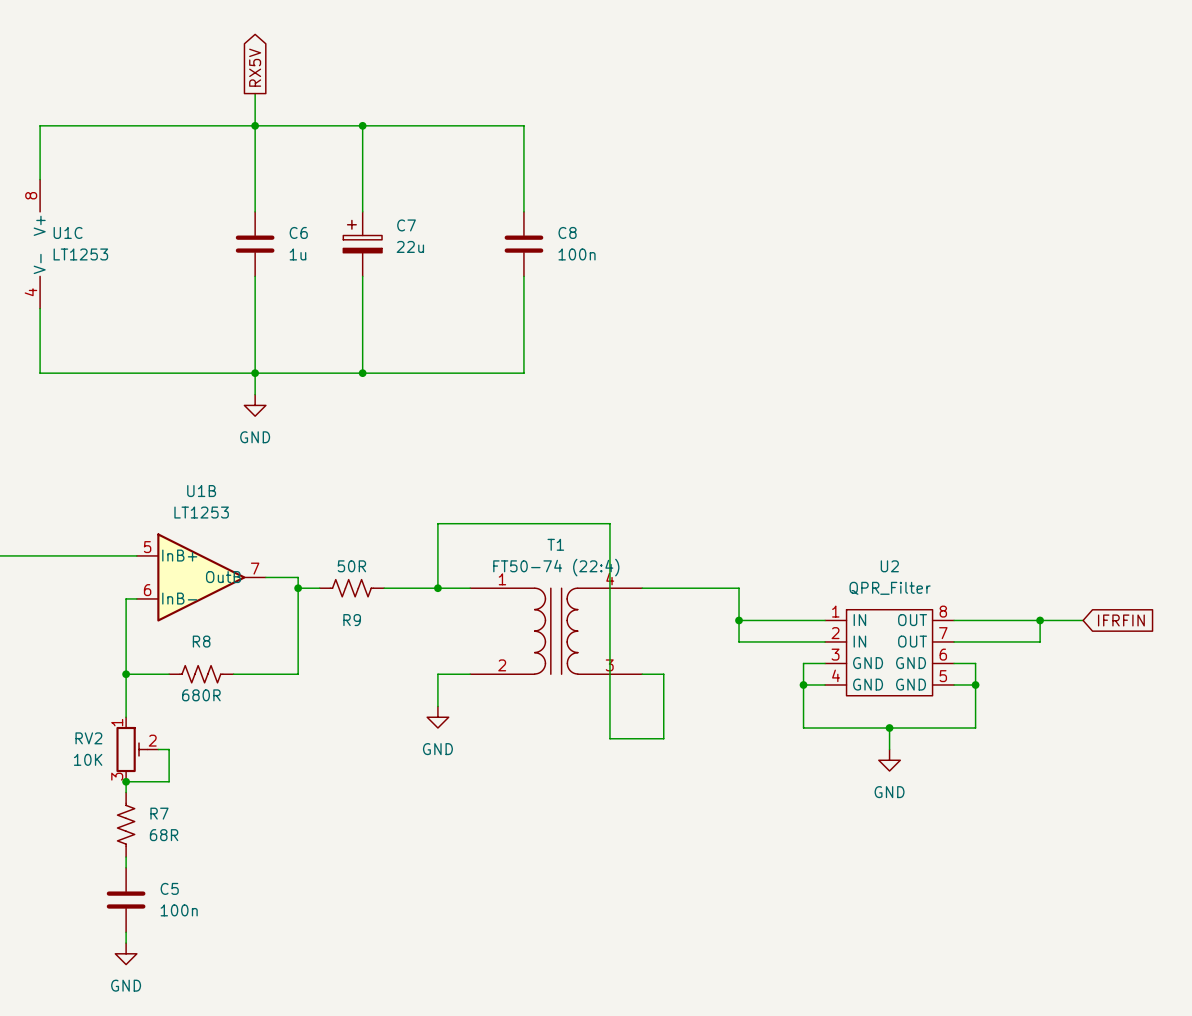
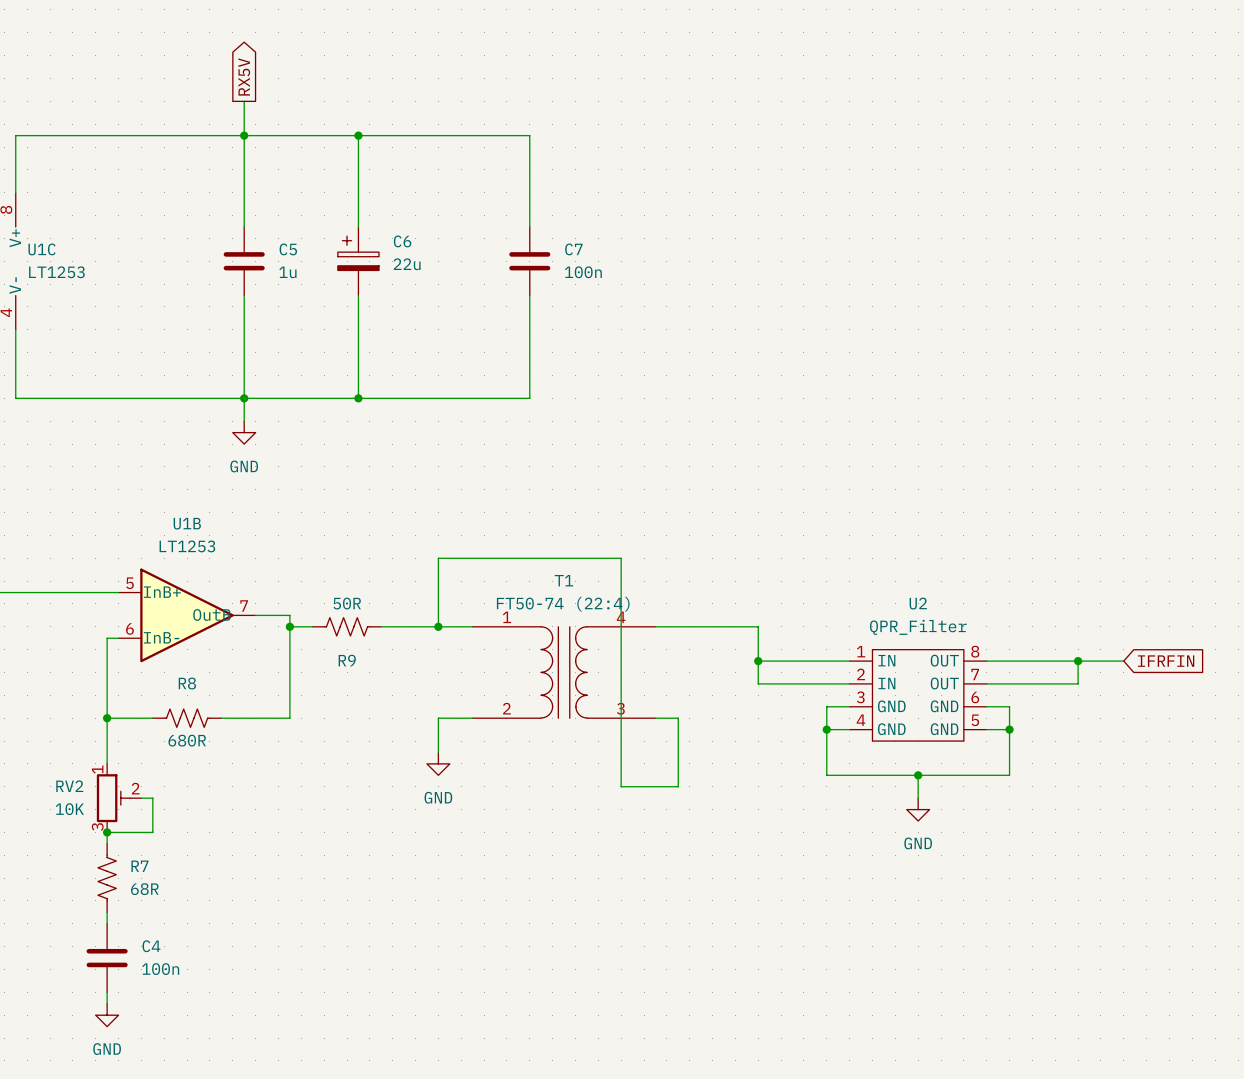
C7 name: C7 (406, 225) -> C6 (402, 241)
C6 name: C6 (298, 232) -> C5 (288, 249)
C8 name: C8 (567, 232) -> C7 (573, 249)
C5 name: C5 (169, 888) -> C4 (151, 946)

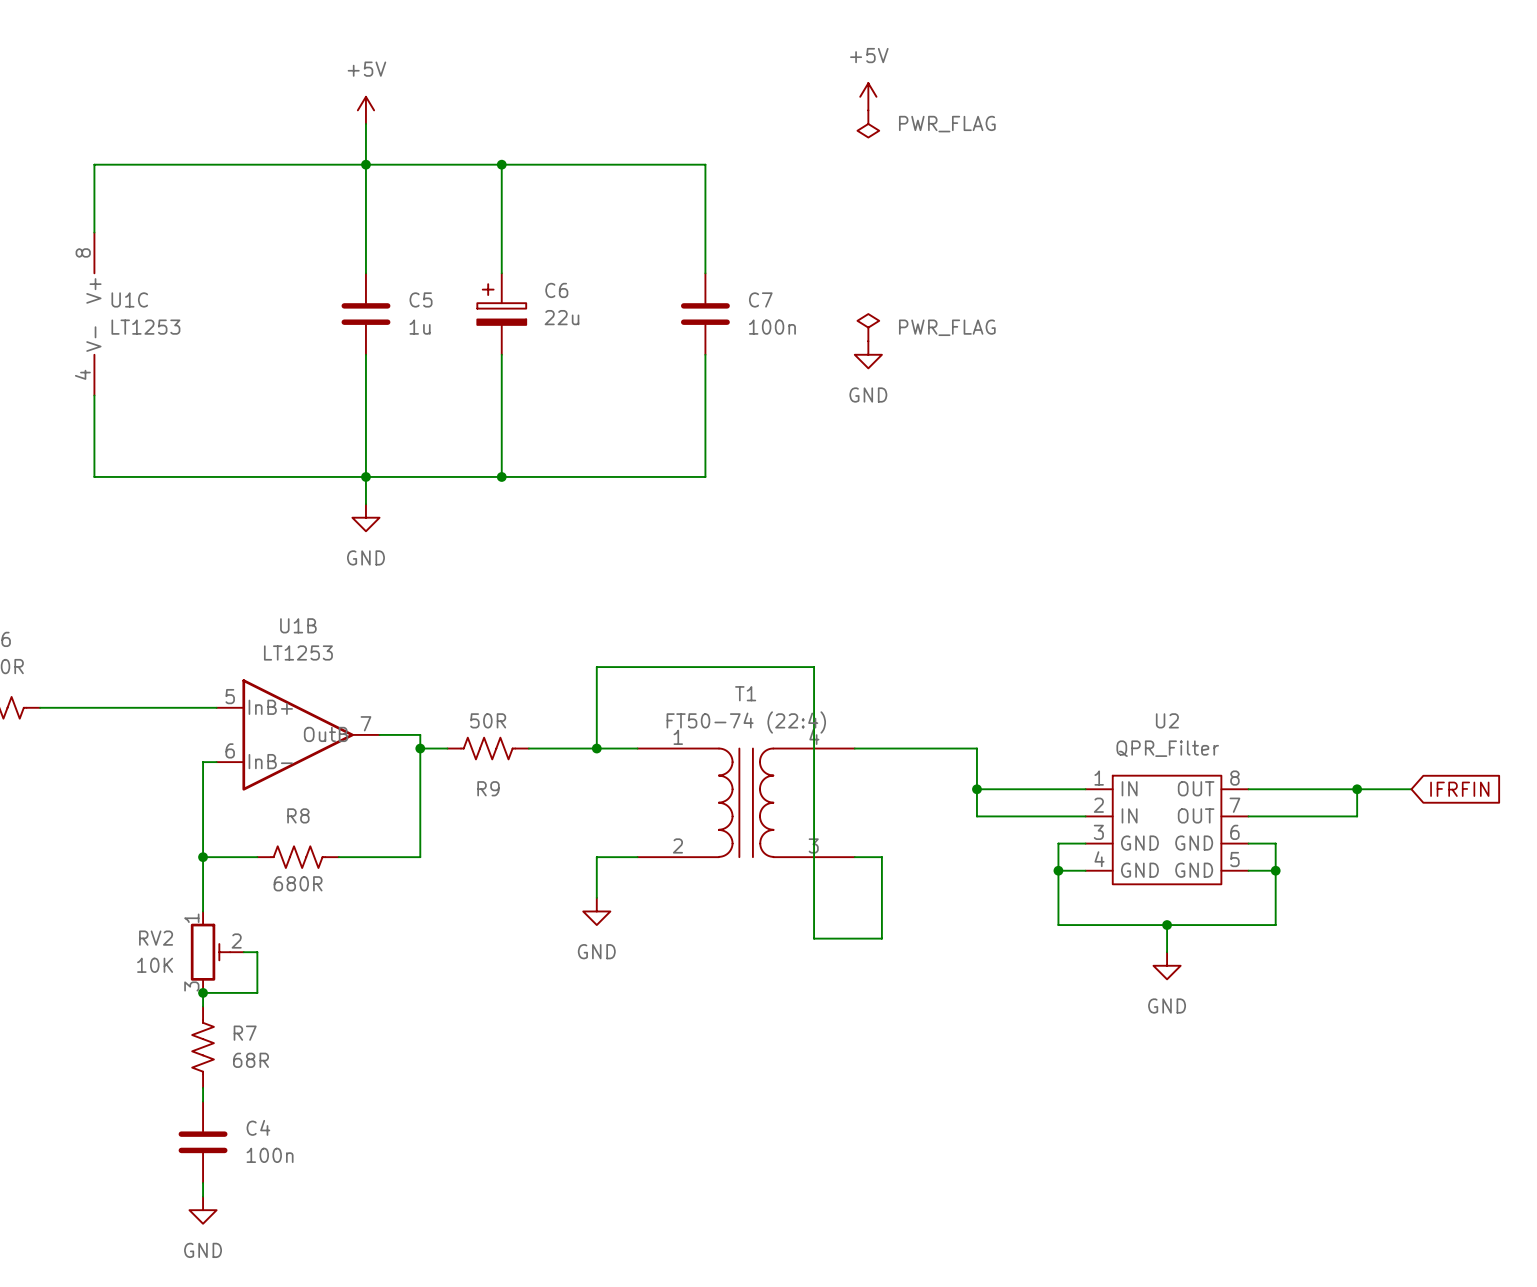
global label: RX5V (244, 76) -> none
power symbol: none -> +5V (868, 96)
power symbol: none -> +5V (365, 110)
power symbol: none -> PWR_FLAG (868, 123)
power symbol: none -> PWR_FLAG (868, 327)
power symbol: none -> GND (868, 354)

